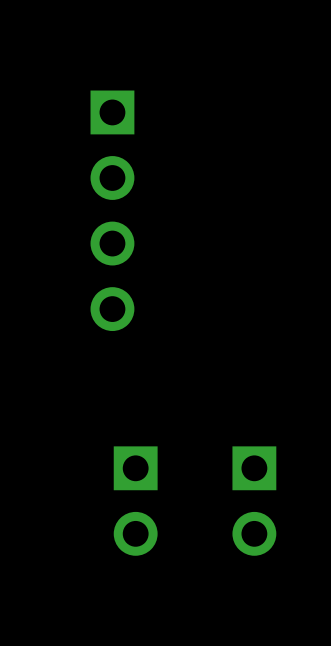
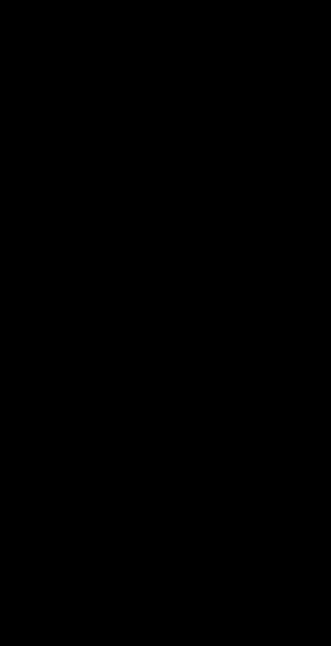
part: (112, 210) -> none
part: (135, 501) -> none
part: (254, 501) -> none

